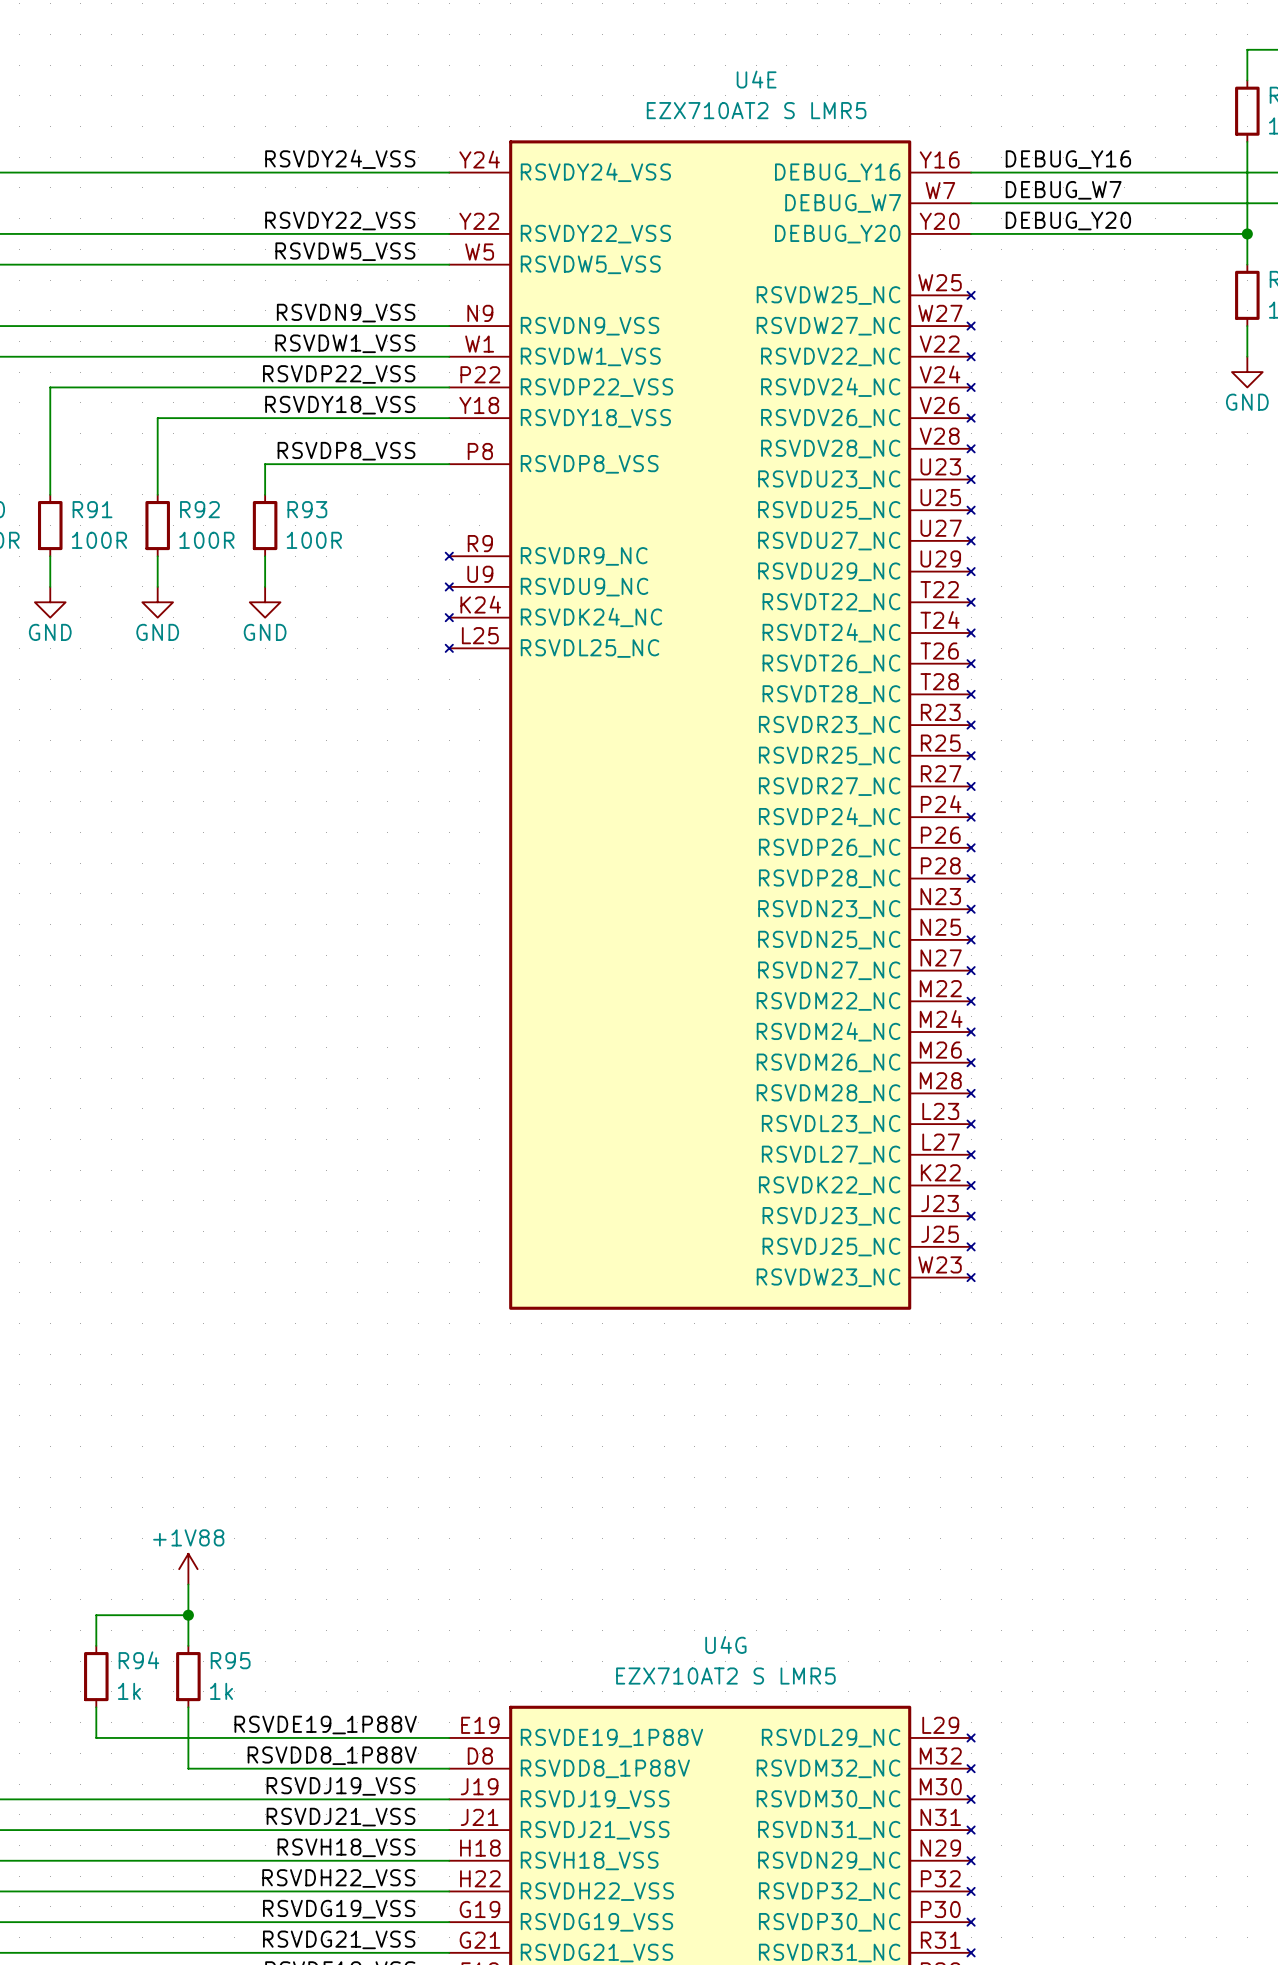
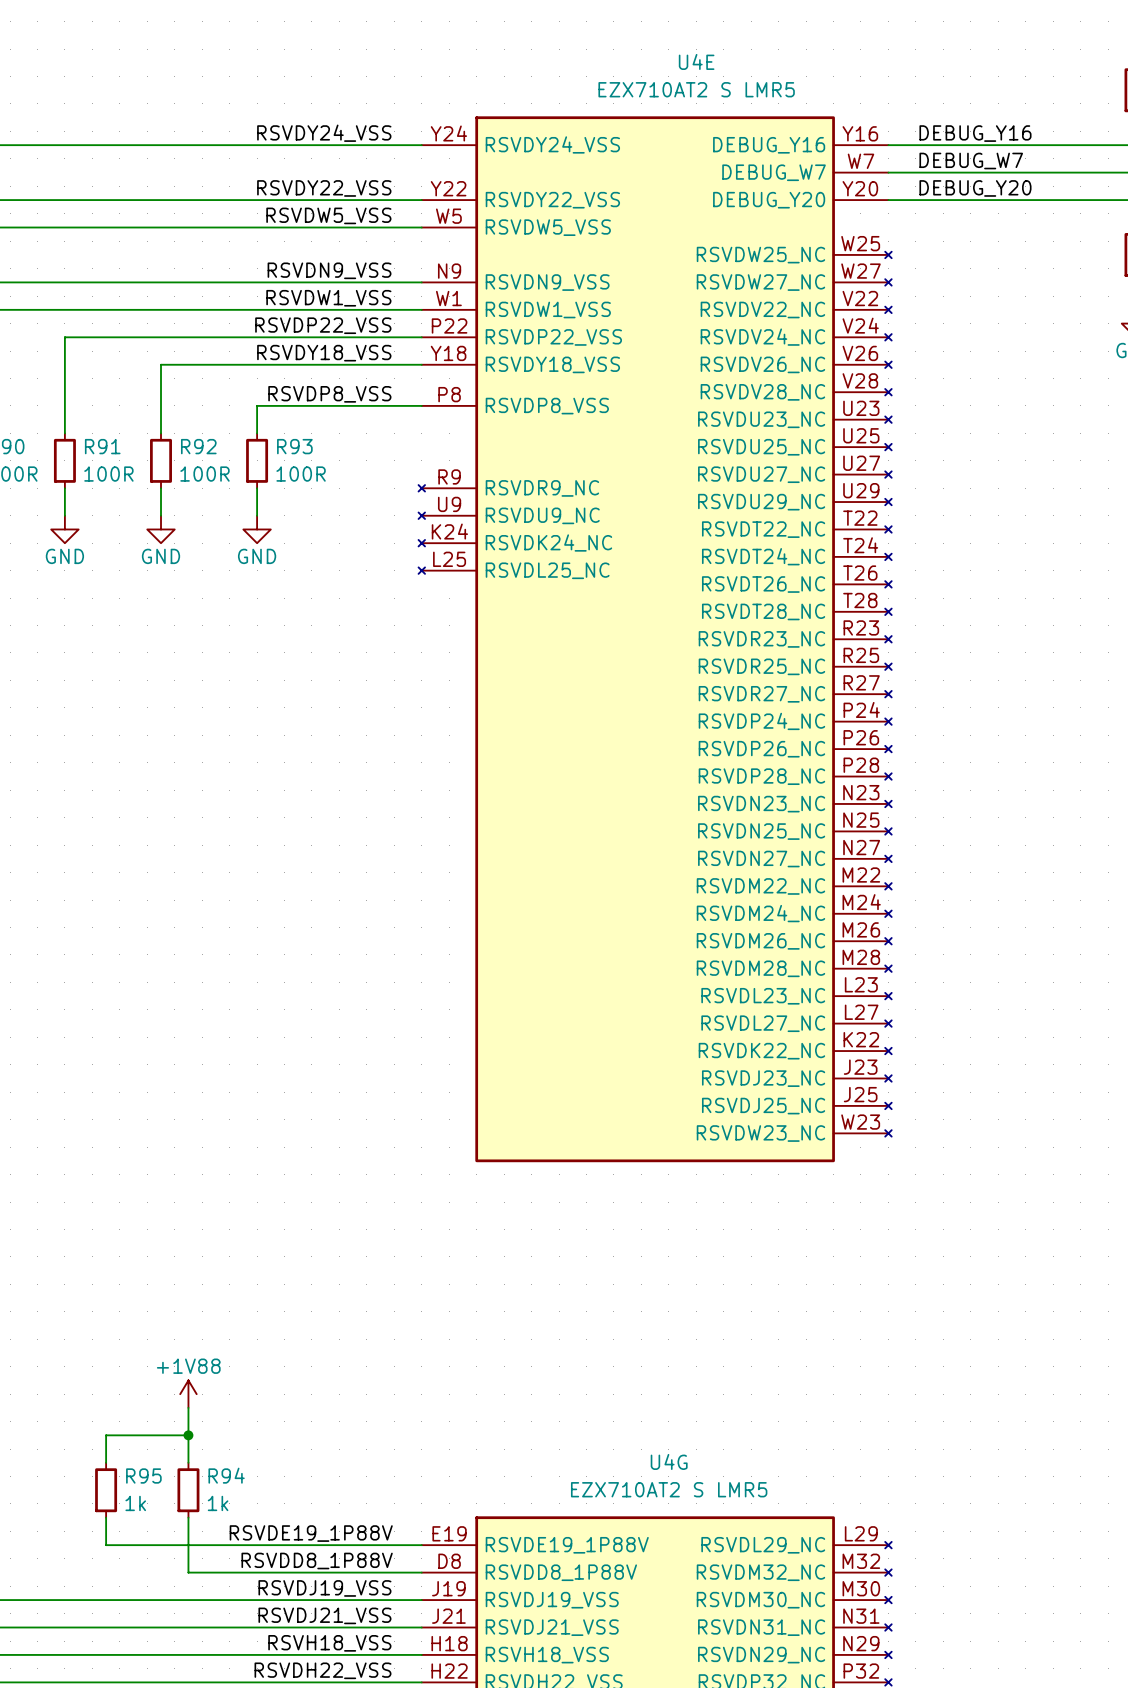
R94 name: R94 (138, 1660) -> R95 (143, 1476)
R95 name: R95 (230, 1660) -> R94 (226, 1475)

